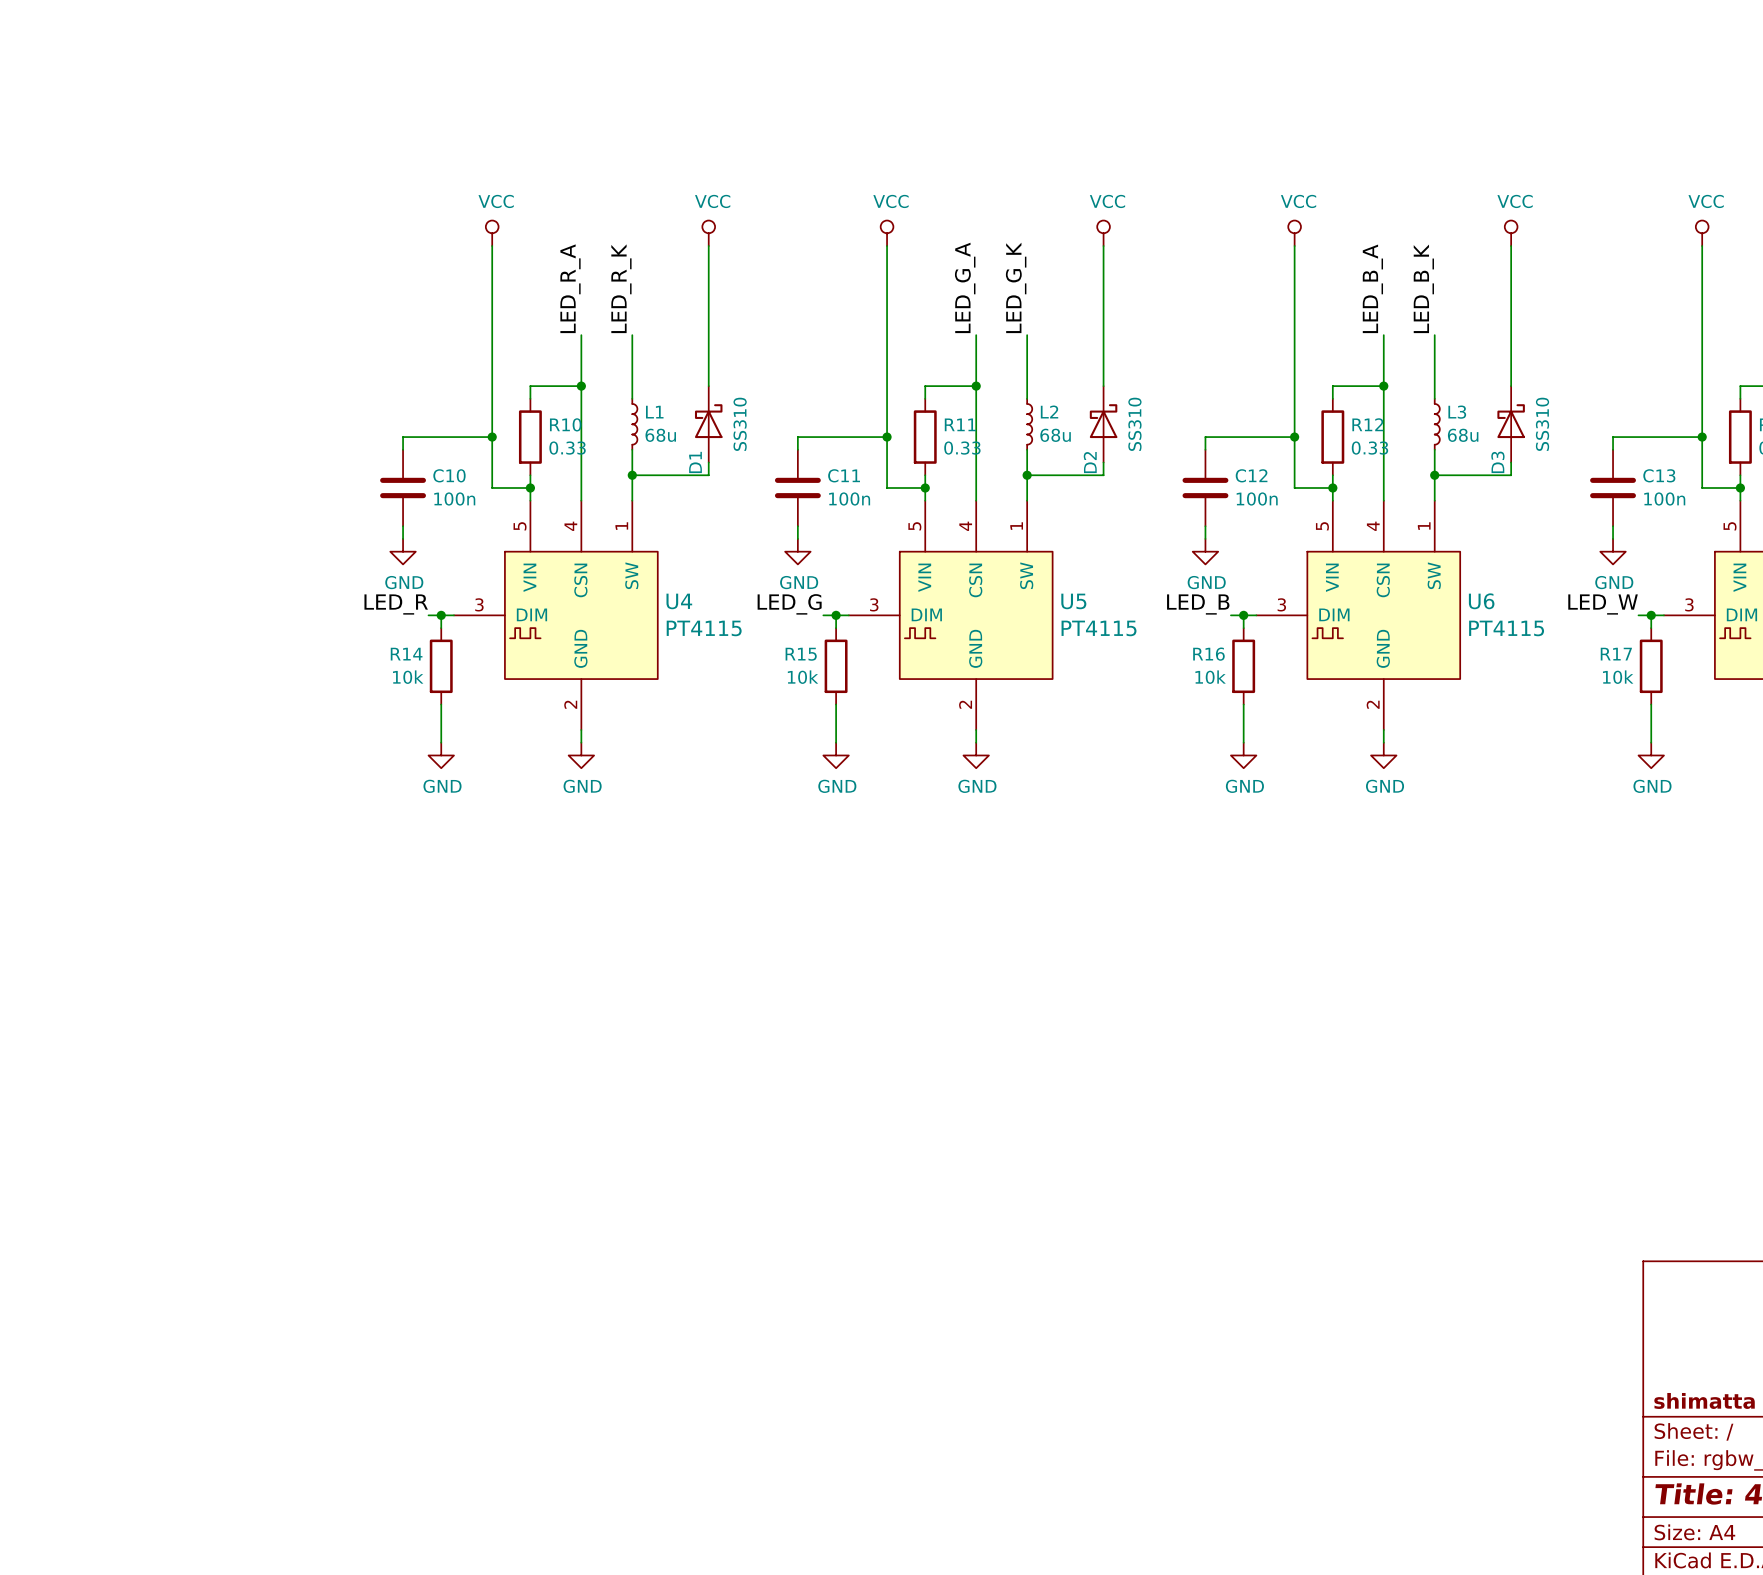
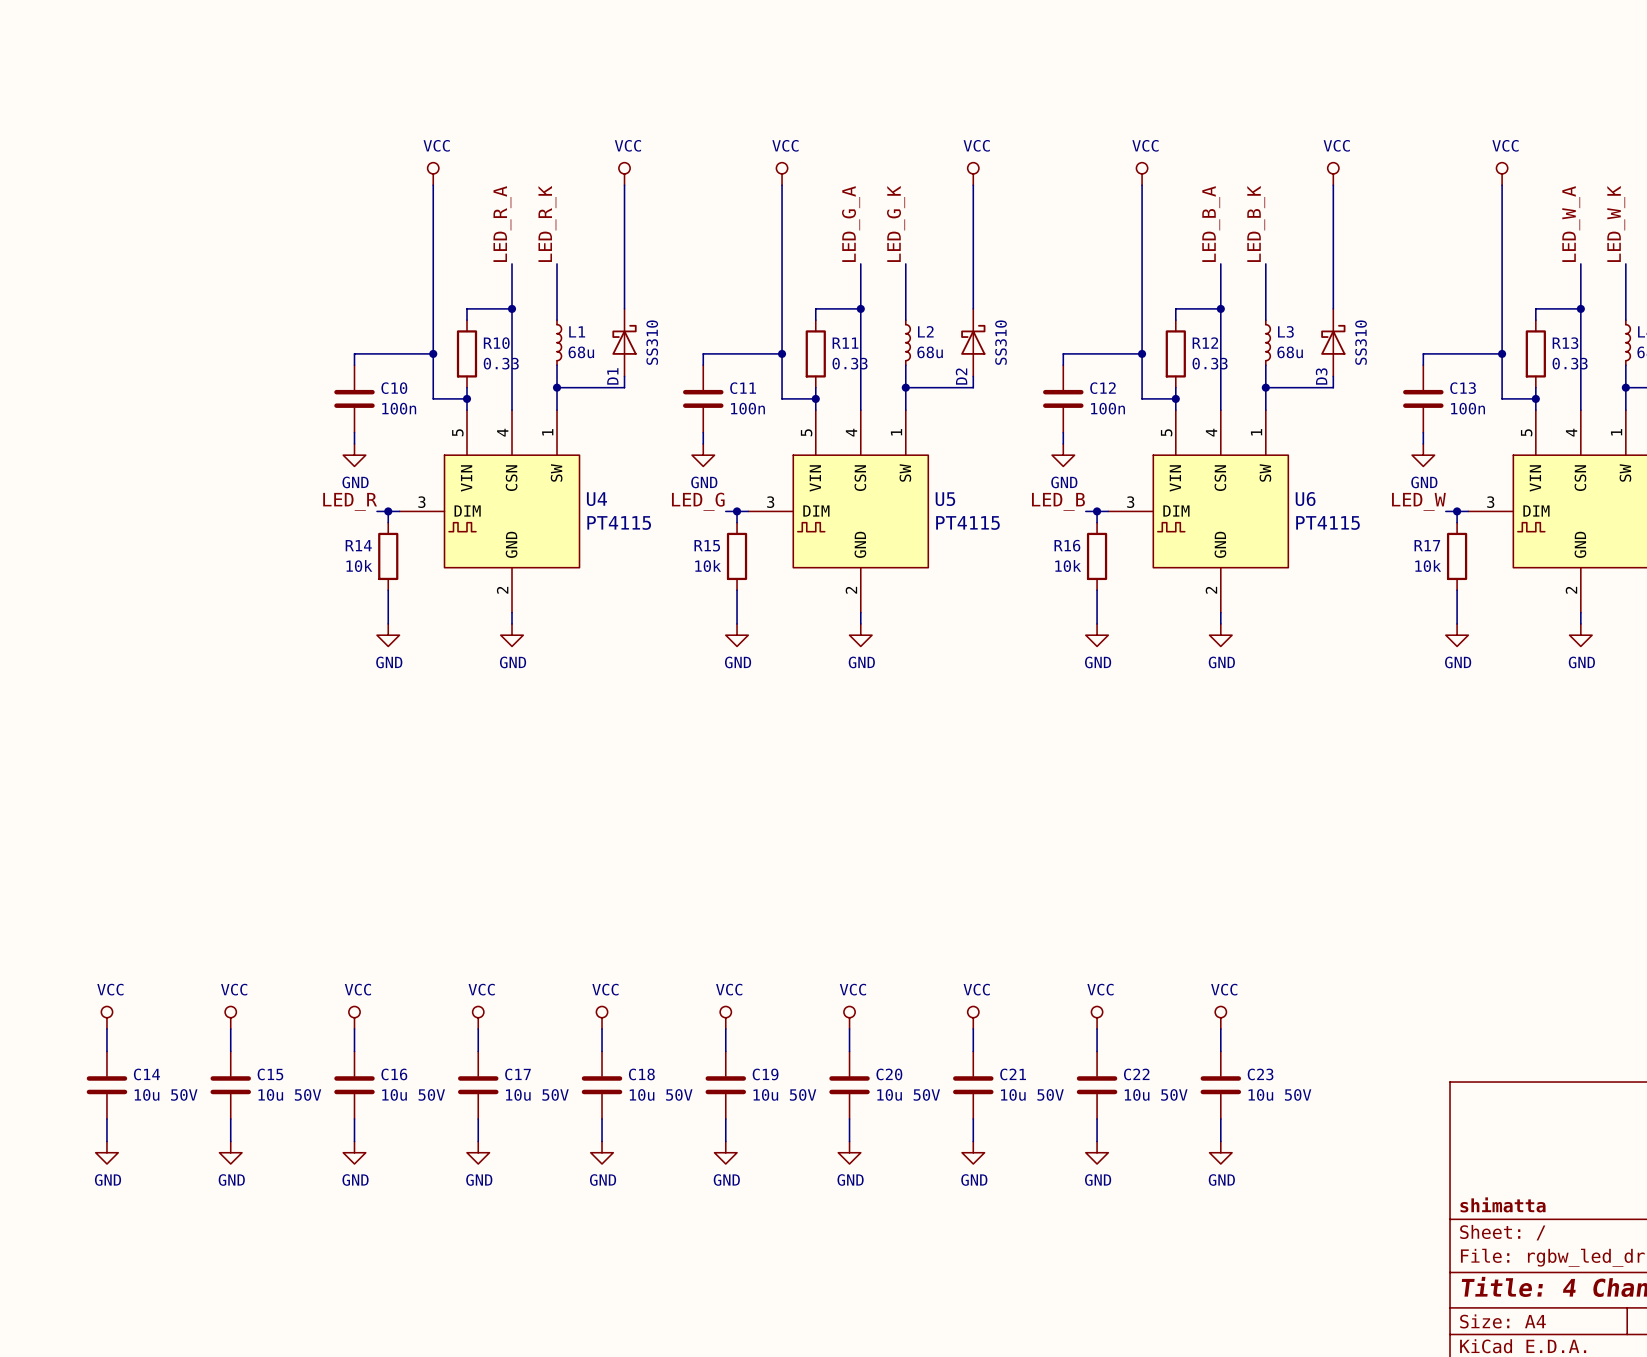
power symbol: none -> VCC (106, 1017)
power symbol: none -> VCC (230, 1017)
power symbol: none -> VCC (354, 1017)
power symbol: none -> VCC (478, 1017)
power symbol: none -> VCC (602, 1017)
power symbol: none -> VCC (725, 1017)
power symbol: none -> VCC (849, 1017)
power symbol: none -> VCC (973, 1017)
power symbol: none -> VCC (1097, 1017)
power symbol: none -> VCC (1220, 1017)
wire: none -> (106, 1028) (106, 1051)
wire: none -> (230, 1028) (230, 1051)
wire: none -> (354, 1028) (354, 1051)
wire: none -> (478, 1028) (478, 1051)
wire: none -> (602, 1028) (602, 1051)
wire: none -> (725, 1028) (725, 1051)
wire: none -> (849, 1028) (849, 1051)
wire: none -> (973, 1028) (973, 1051)
wire: none -> (1097, 1028) (1097, 1051)
wire: none -> (1220, 1028) (1220, 1051)
C14: none -> 10u 50V (106, 1085)
C15: none -> 10u 50V (230, 1085)
C16: none -> 10u 50V (354, 1085)
C17: none -> 10u 50V (478, 1085)
C18: none -> 10u 50V (602, 1085)
C19: none -> 10u 50V (725, 1085)
C20: none -> 10u 50V (849, 1085)
C21: none -> 10u 50V (973, 1085)
C22: none -> 10u 50V (1097, 1085)
C23: none -> 10u 50V (1220, 1085)
wire: none -> (106, 1118) (106, 1141)
wire: none -> (230, 1118) (230, 1141)
wire: none -> (354, 1118) (354, 1141)
wire: none -> (478, 1118) (478, 1141)
wire: none -> (602, 1118) (602, 1141)
wire: none -> (725, 1118) (725, 1141)
wire: none -> (849, 1118) (849, 1141)
wire: none -> (973, 1118) (973, 1141)
wire: none -> (1097, 1118) (1097, 1141)
wire: none -> (1220, 1118) (1220, 1141)
power symbol: none -> GND (106, 1152)
power symbol: none -> GND (230, 1152)
power symbol: none -> GND (354, 1152)
power symbol: none -> GND (478, 1152)
power symbol: none -> GND (602, 1152)
power symbol: none -> GND (725, 1152)
power symbol: none -> GND (849, 1152)
power symbol: none -> GND (973, 1152)
power symbol: none -> GND (1097, 1152)
power symbol: none -> GND (1220, 1152)

